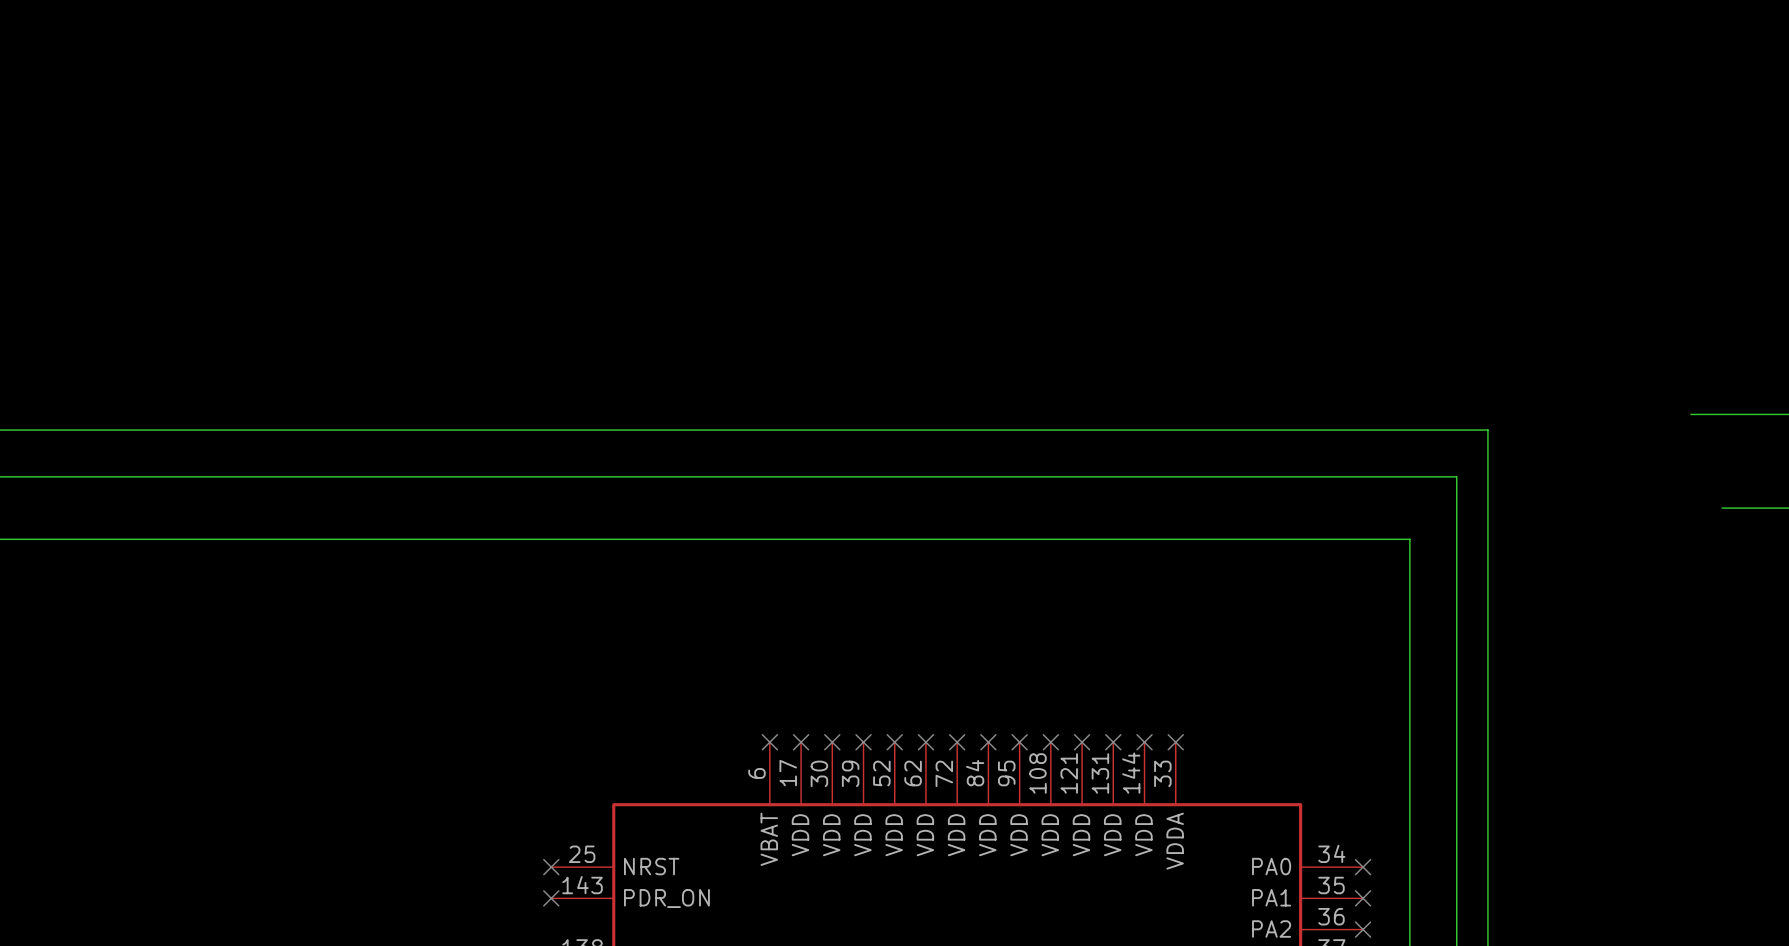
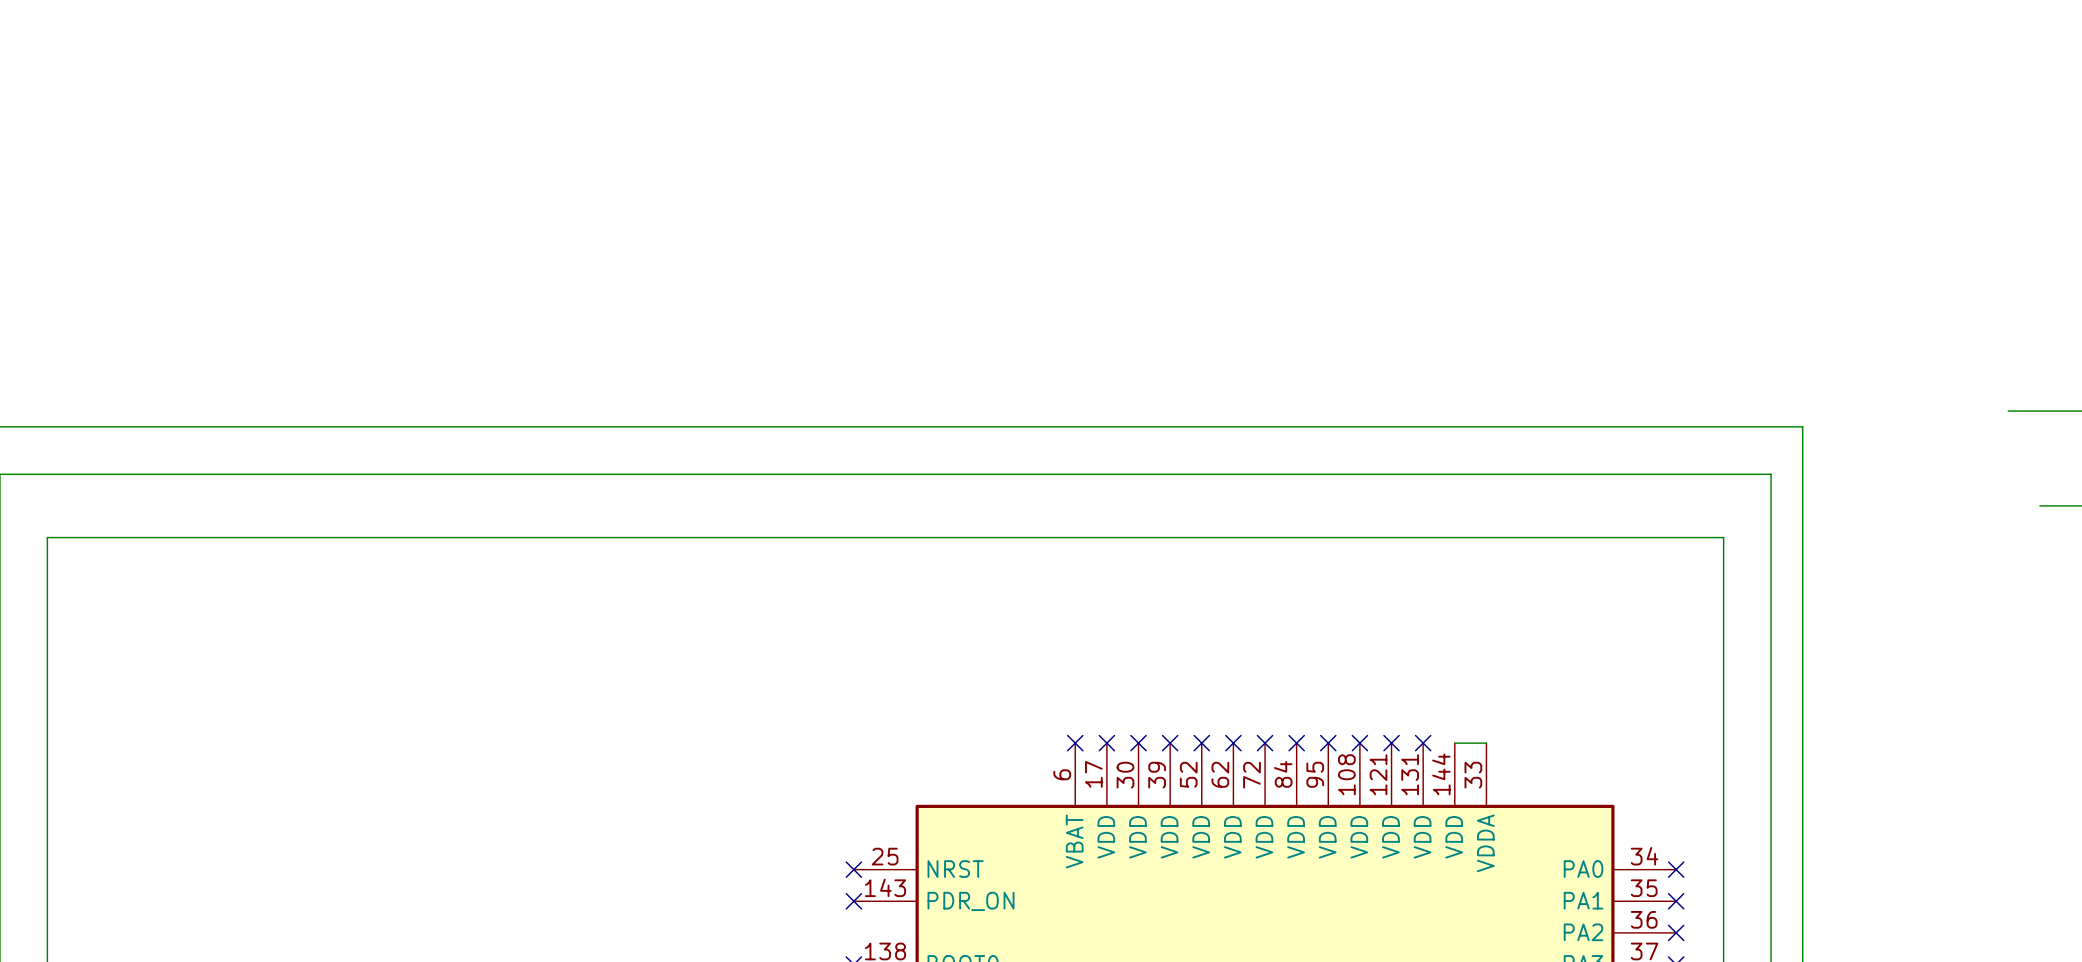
wire: none -> (1454, 743) (1486, 743)
no-connect mark: (1144, 742) -> none
no-connect mark: (1175, 742) -> none

